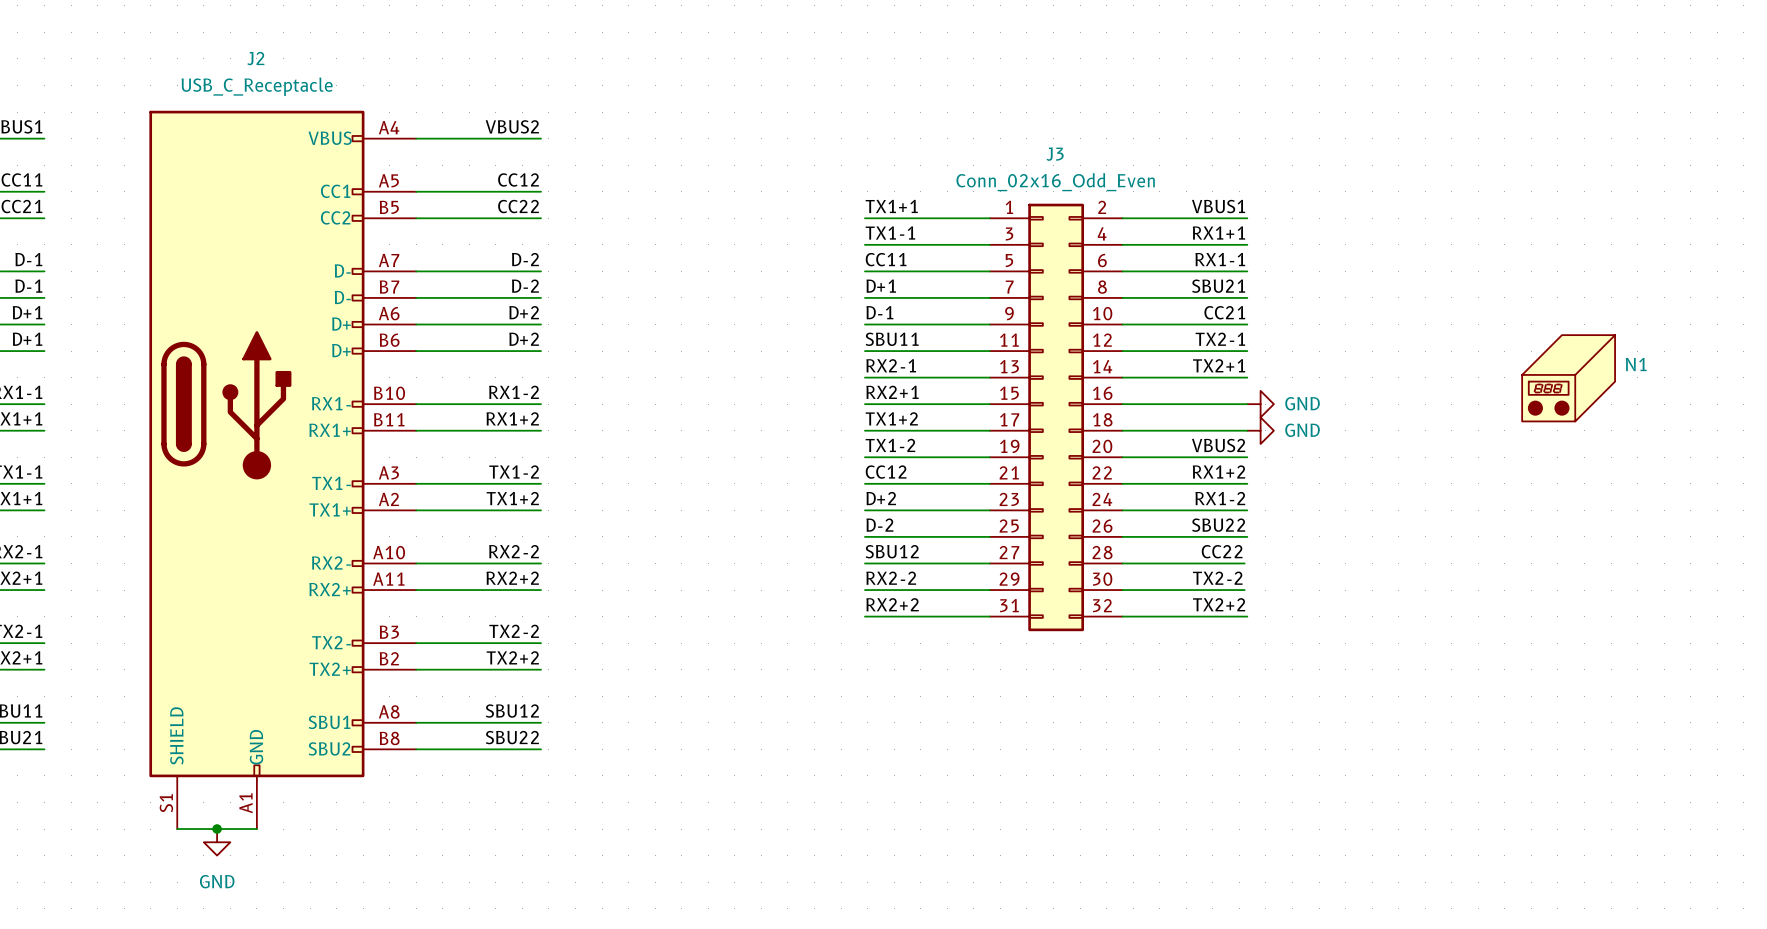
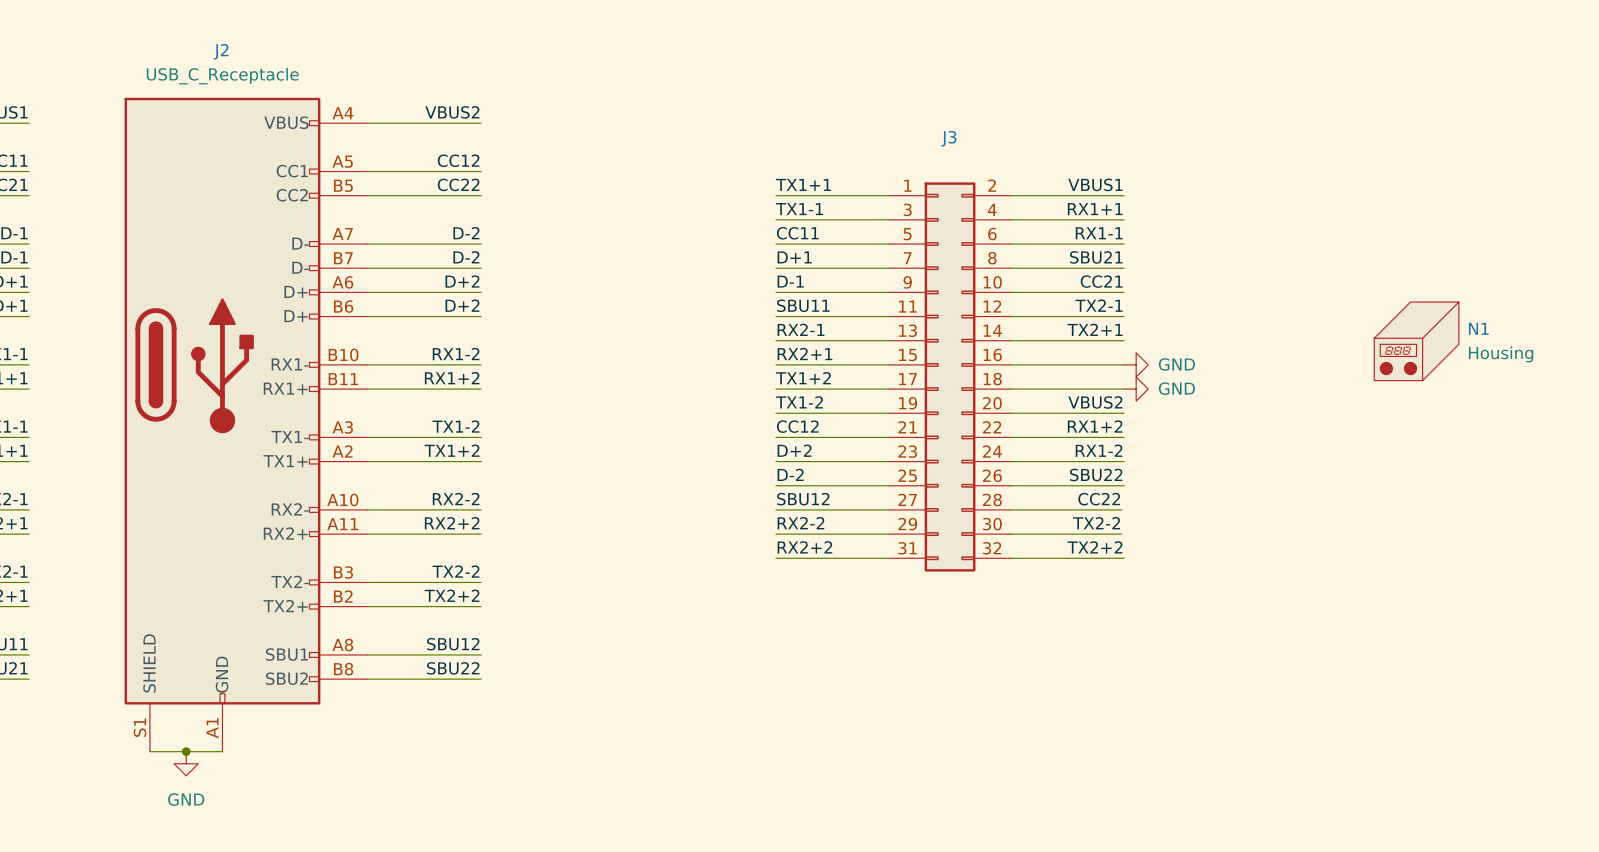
J3 value: Conn_02x16_Odd_Even (1055, 182) -> none
N1 value: none -> Housing (1501, 354)

